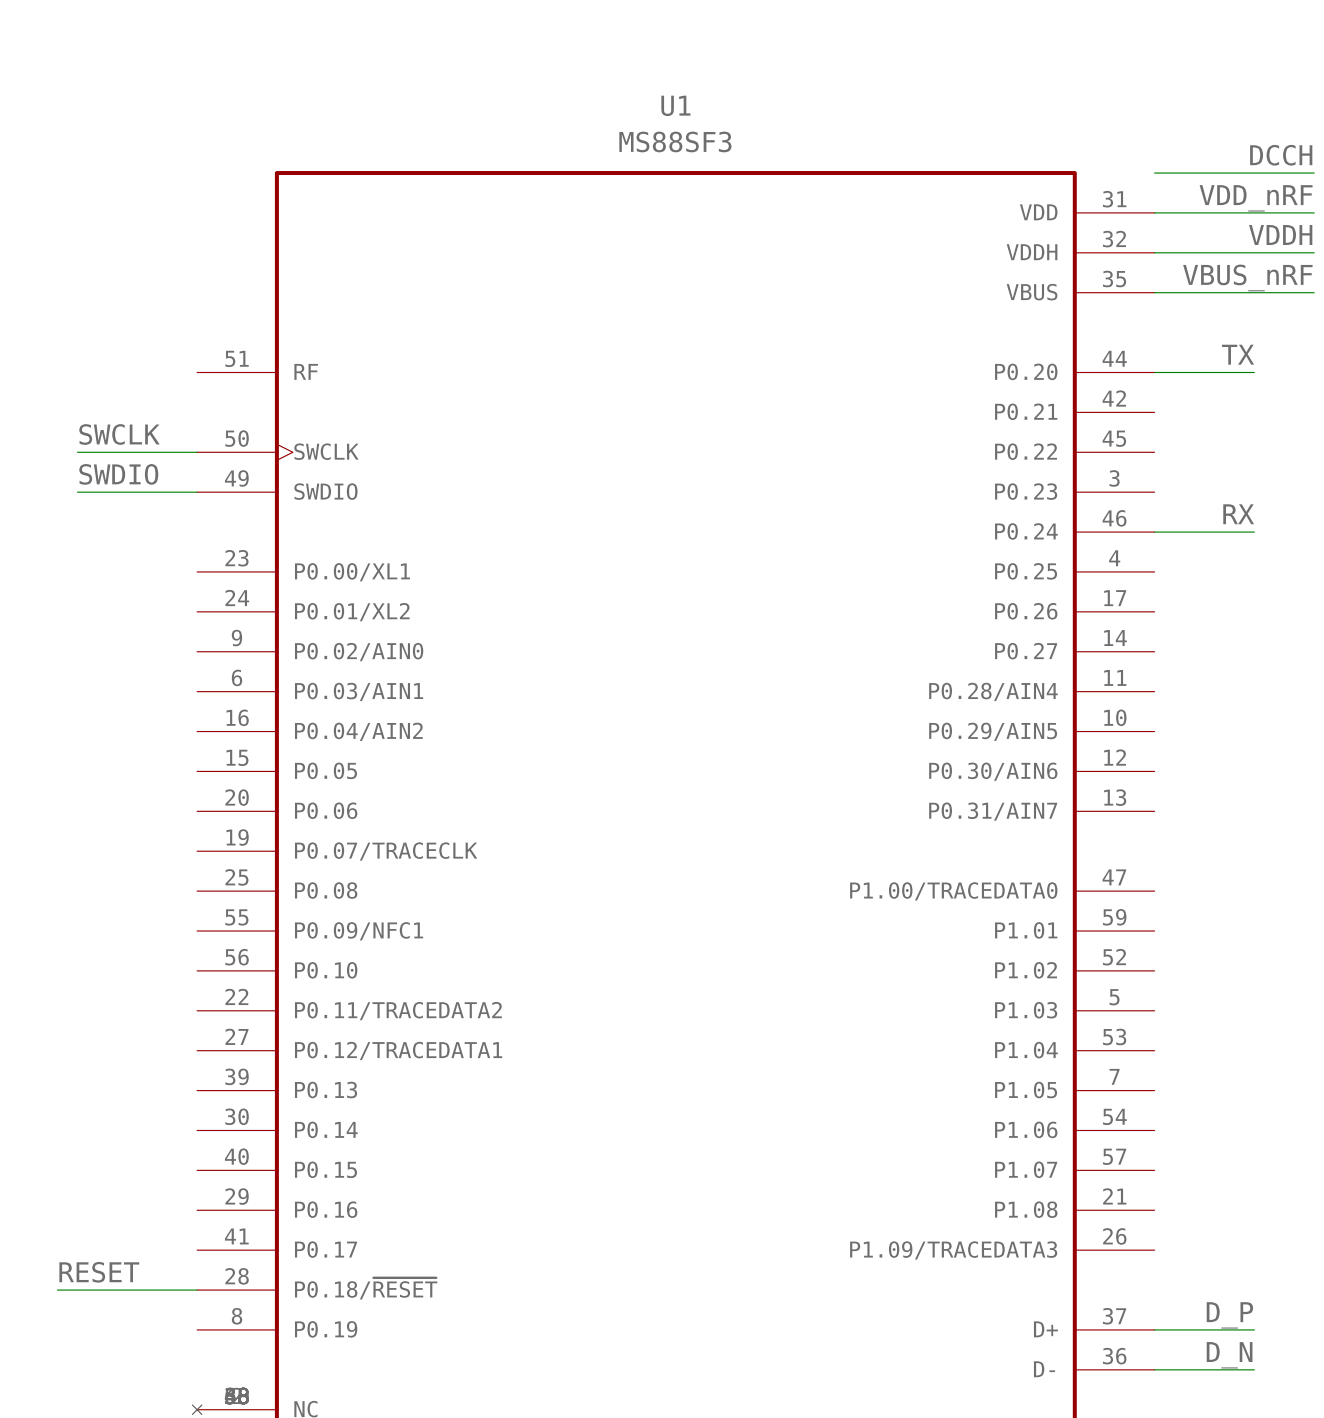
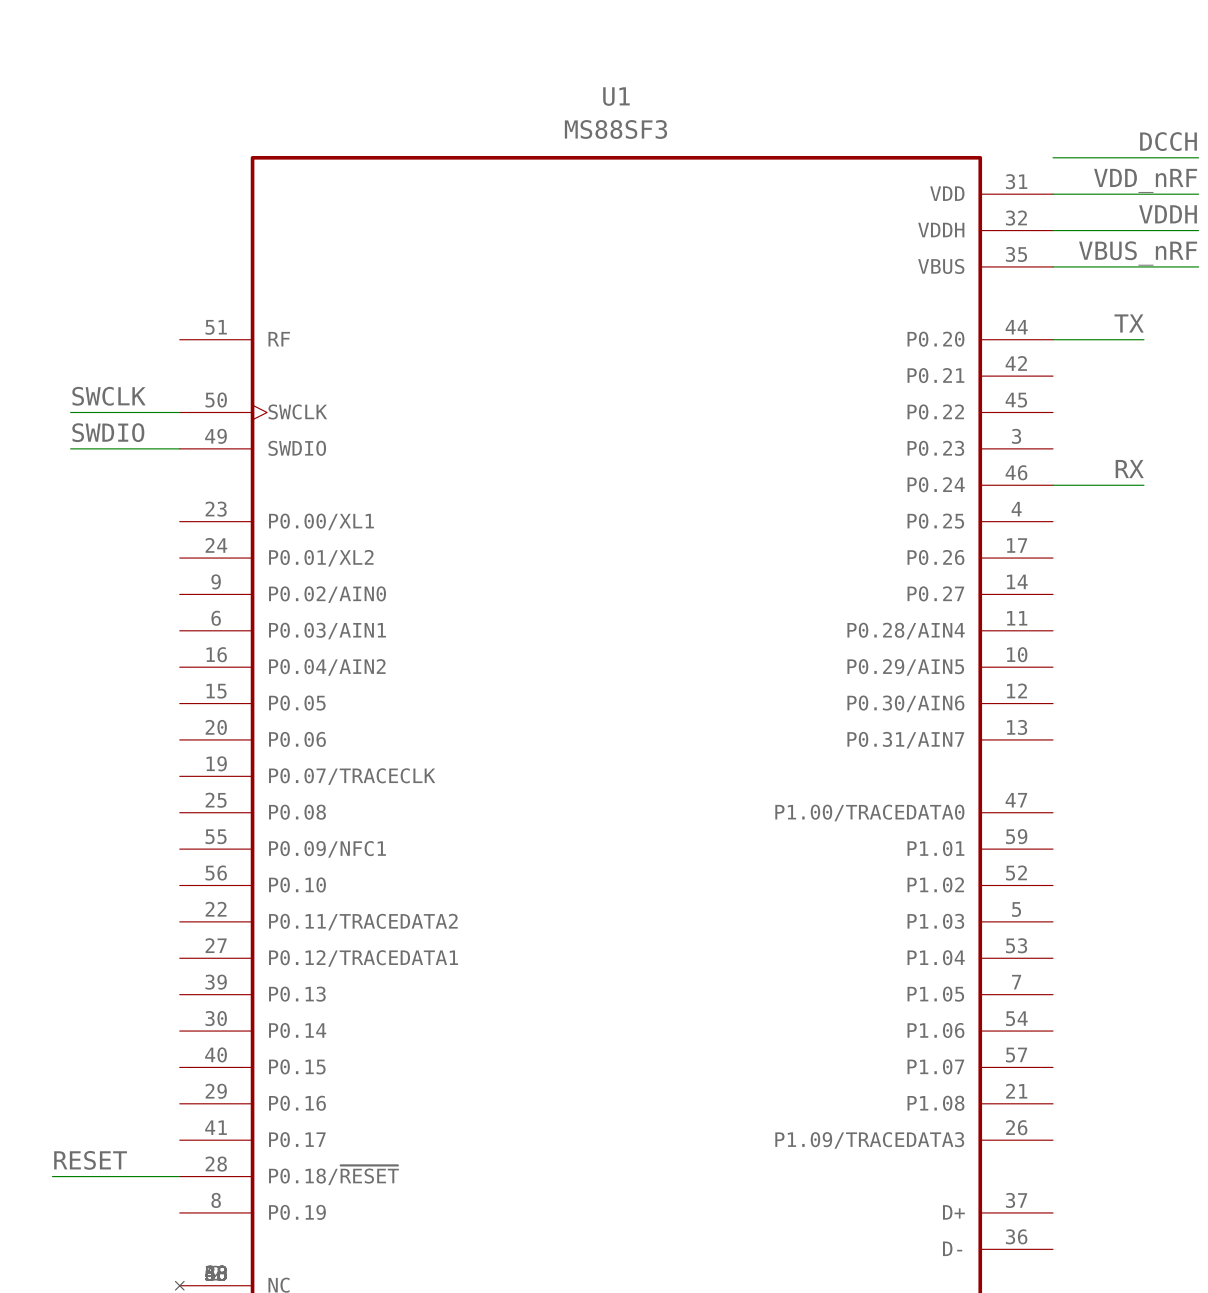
label: D_P (1229, 1315) -> none
wire: (1154, 1329) (1254, 1329) -> none
label: D_N (1229, 1355) -> none
wire: (1154, 1369) (1254, 1369) -> none

